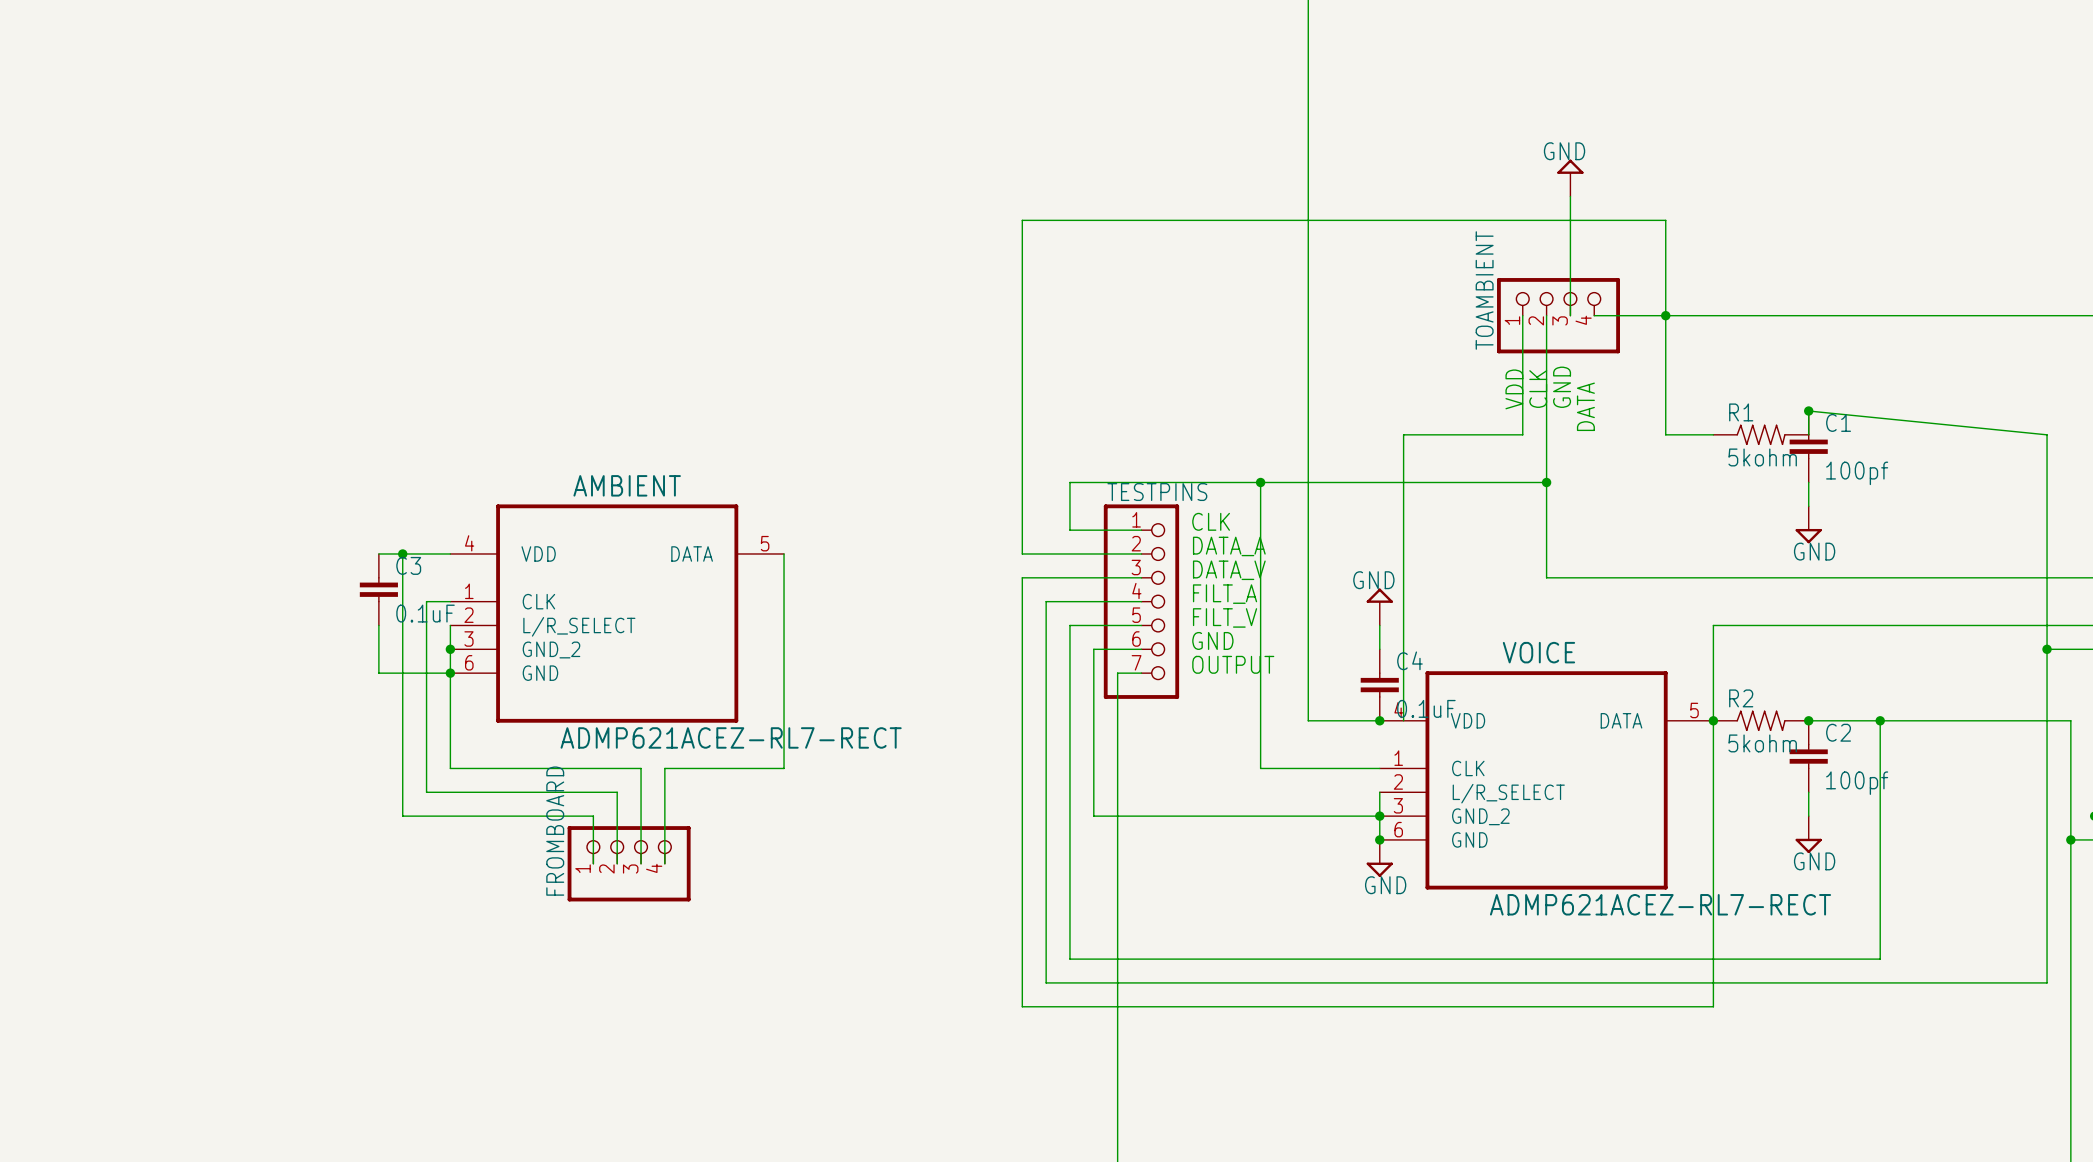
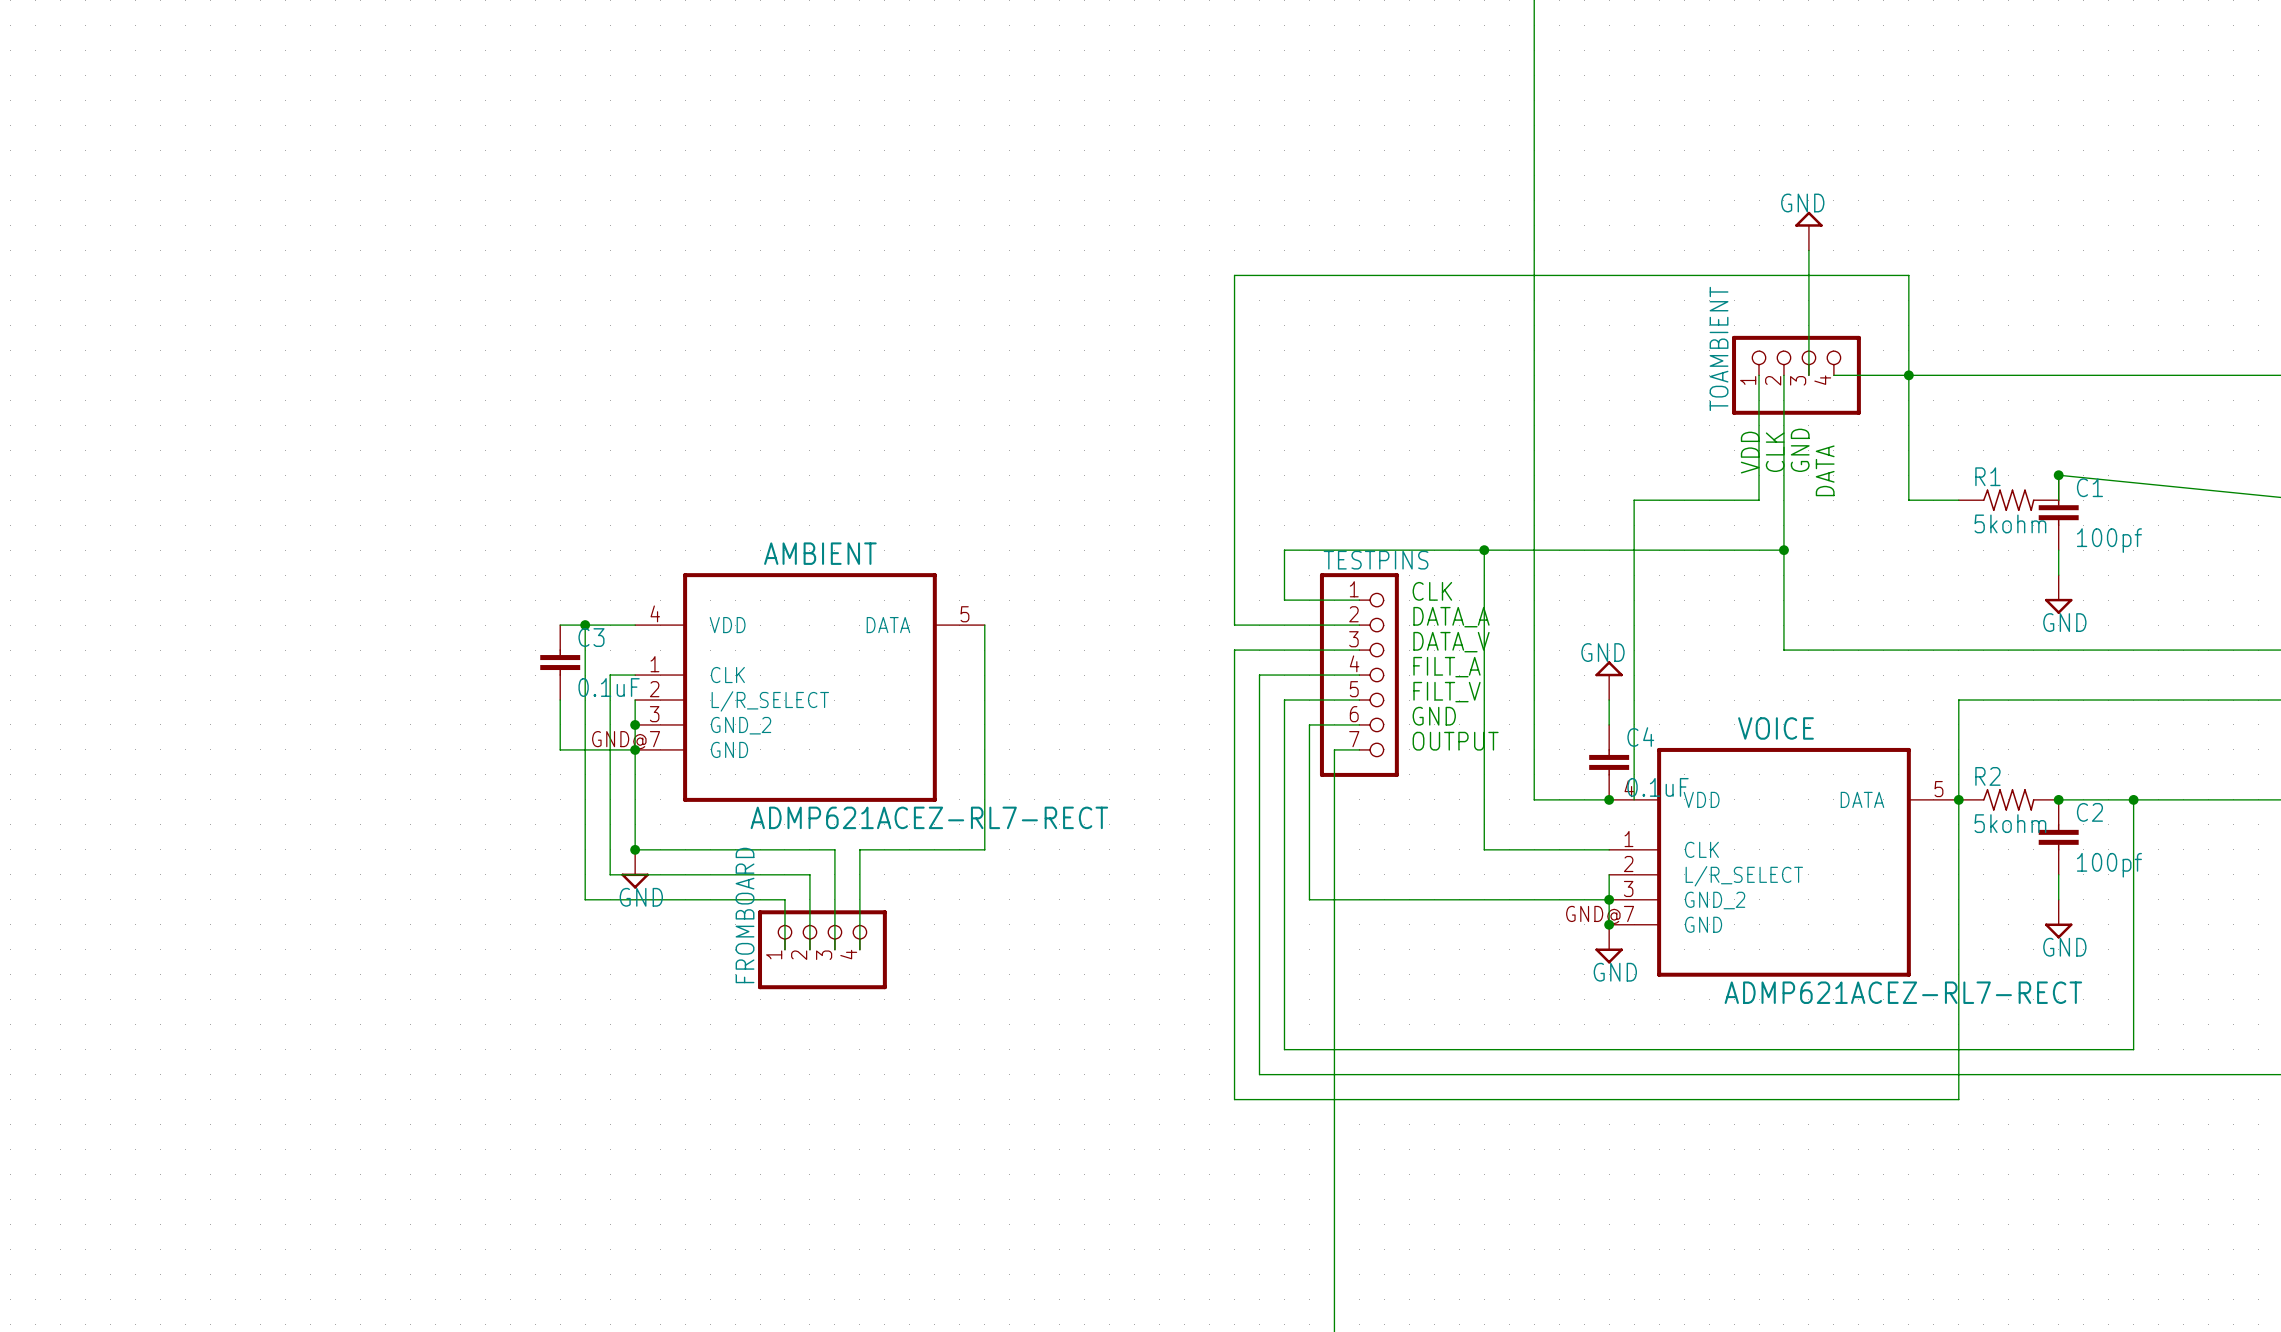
AMBIENT pin number: 6 (469, 662) -> GND@7 (626, 740)
junction: none -> (635, 849)
power symbol: none -> GND (635, 869)
VOICE pin number: 6 (1398, 829) -> GND@7 (1600, 915)

